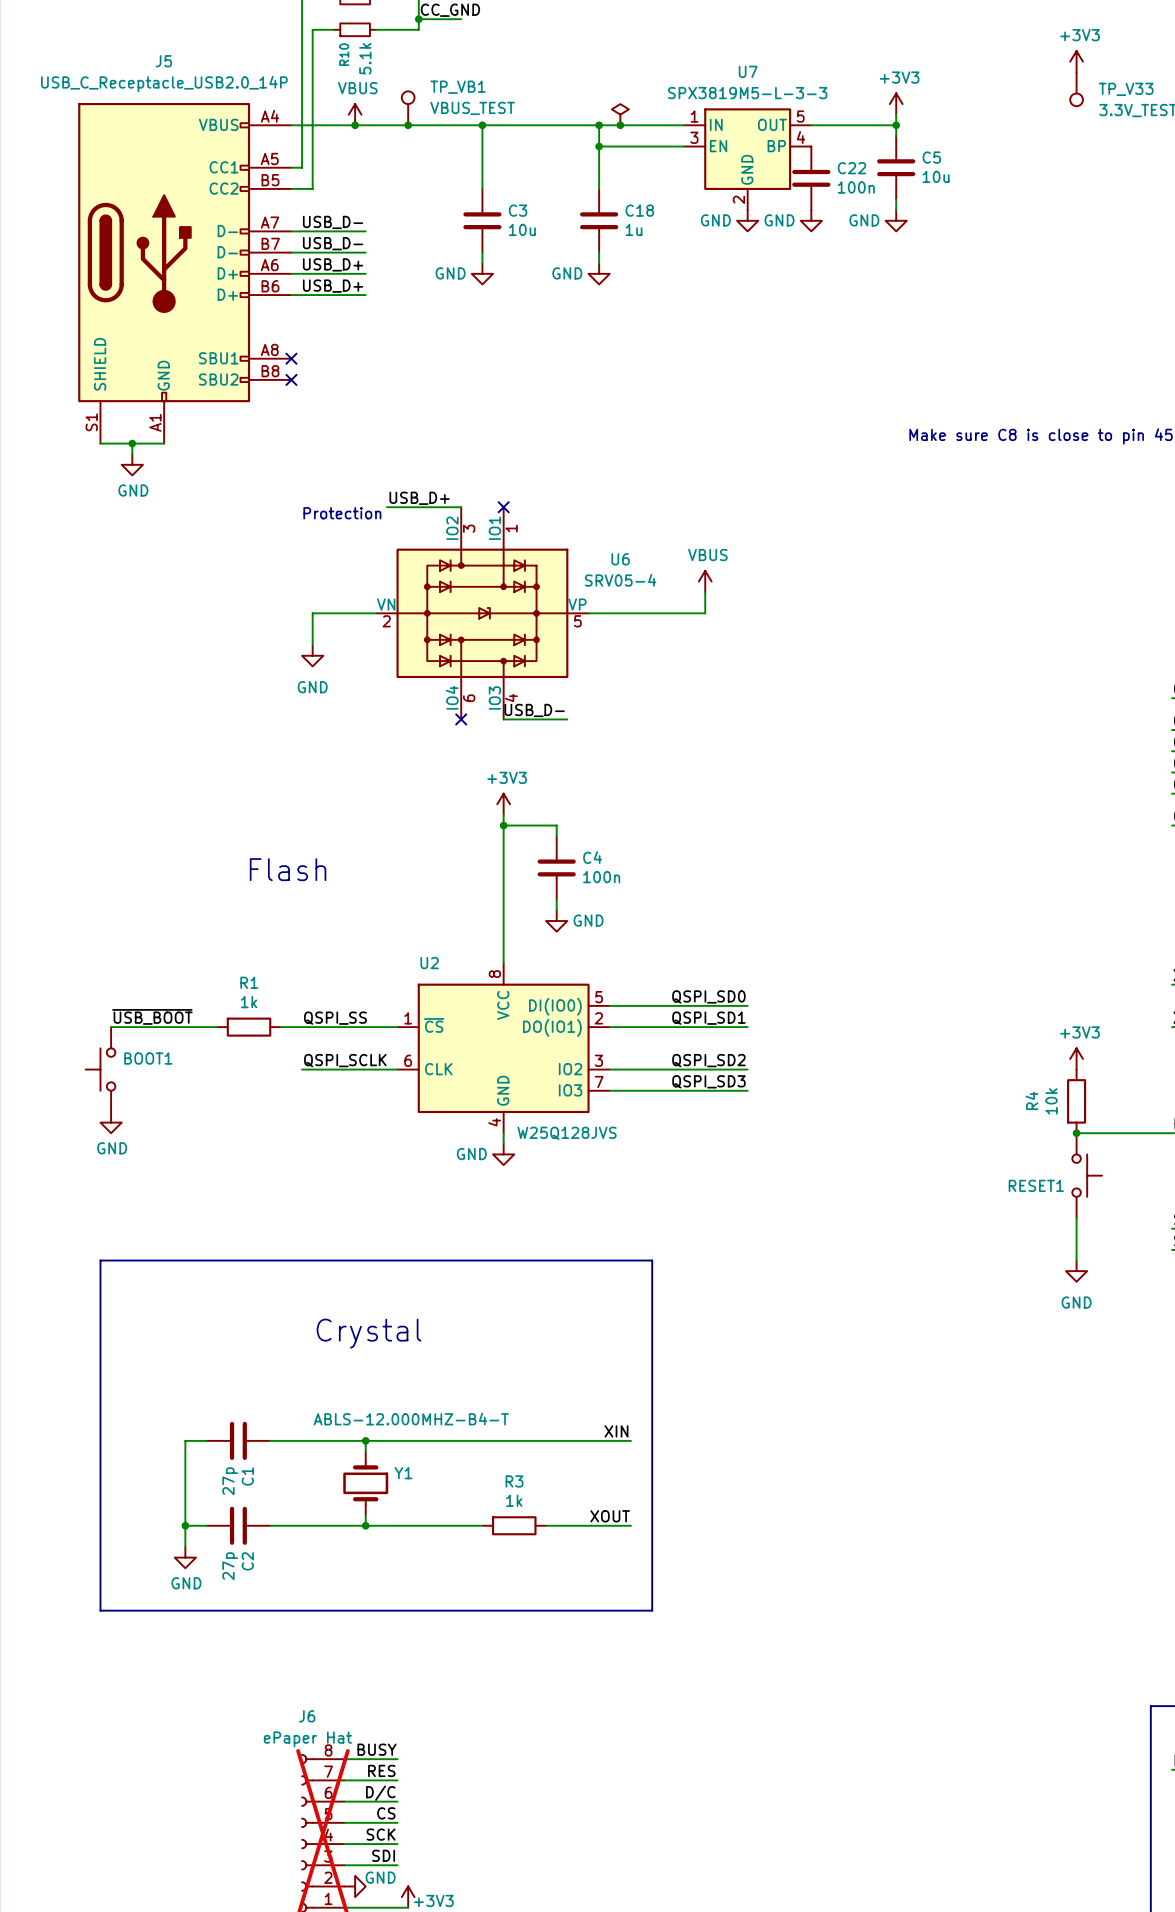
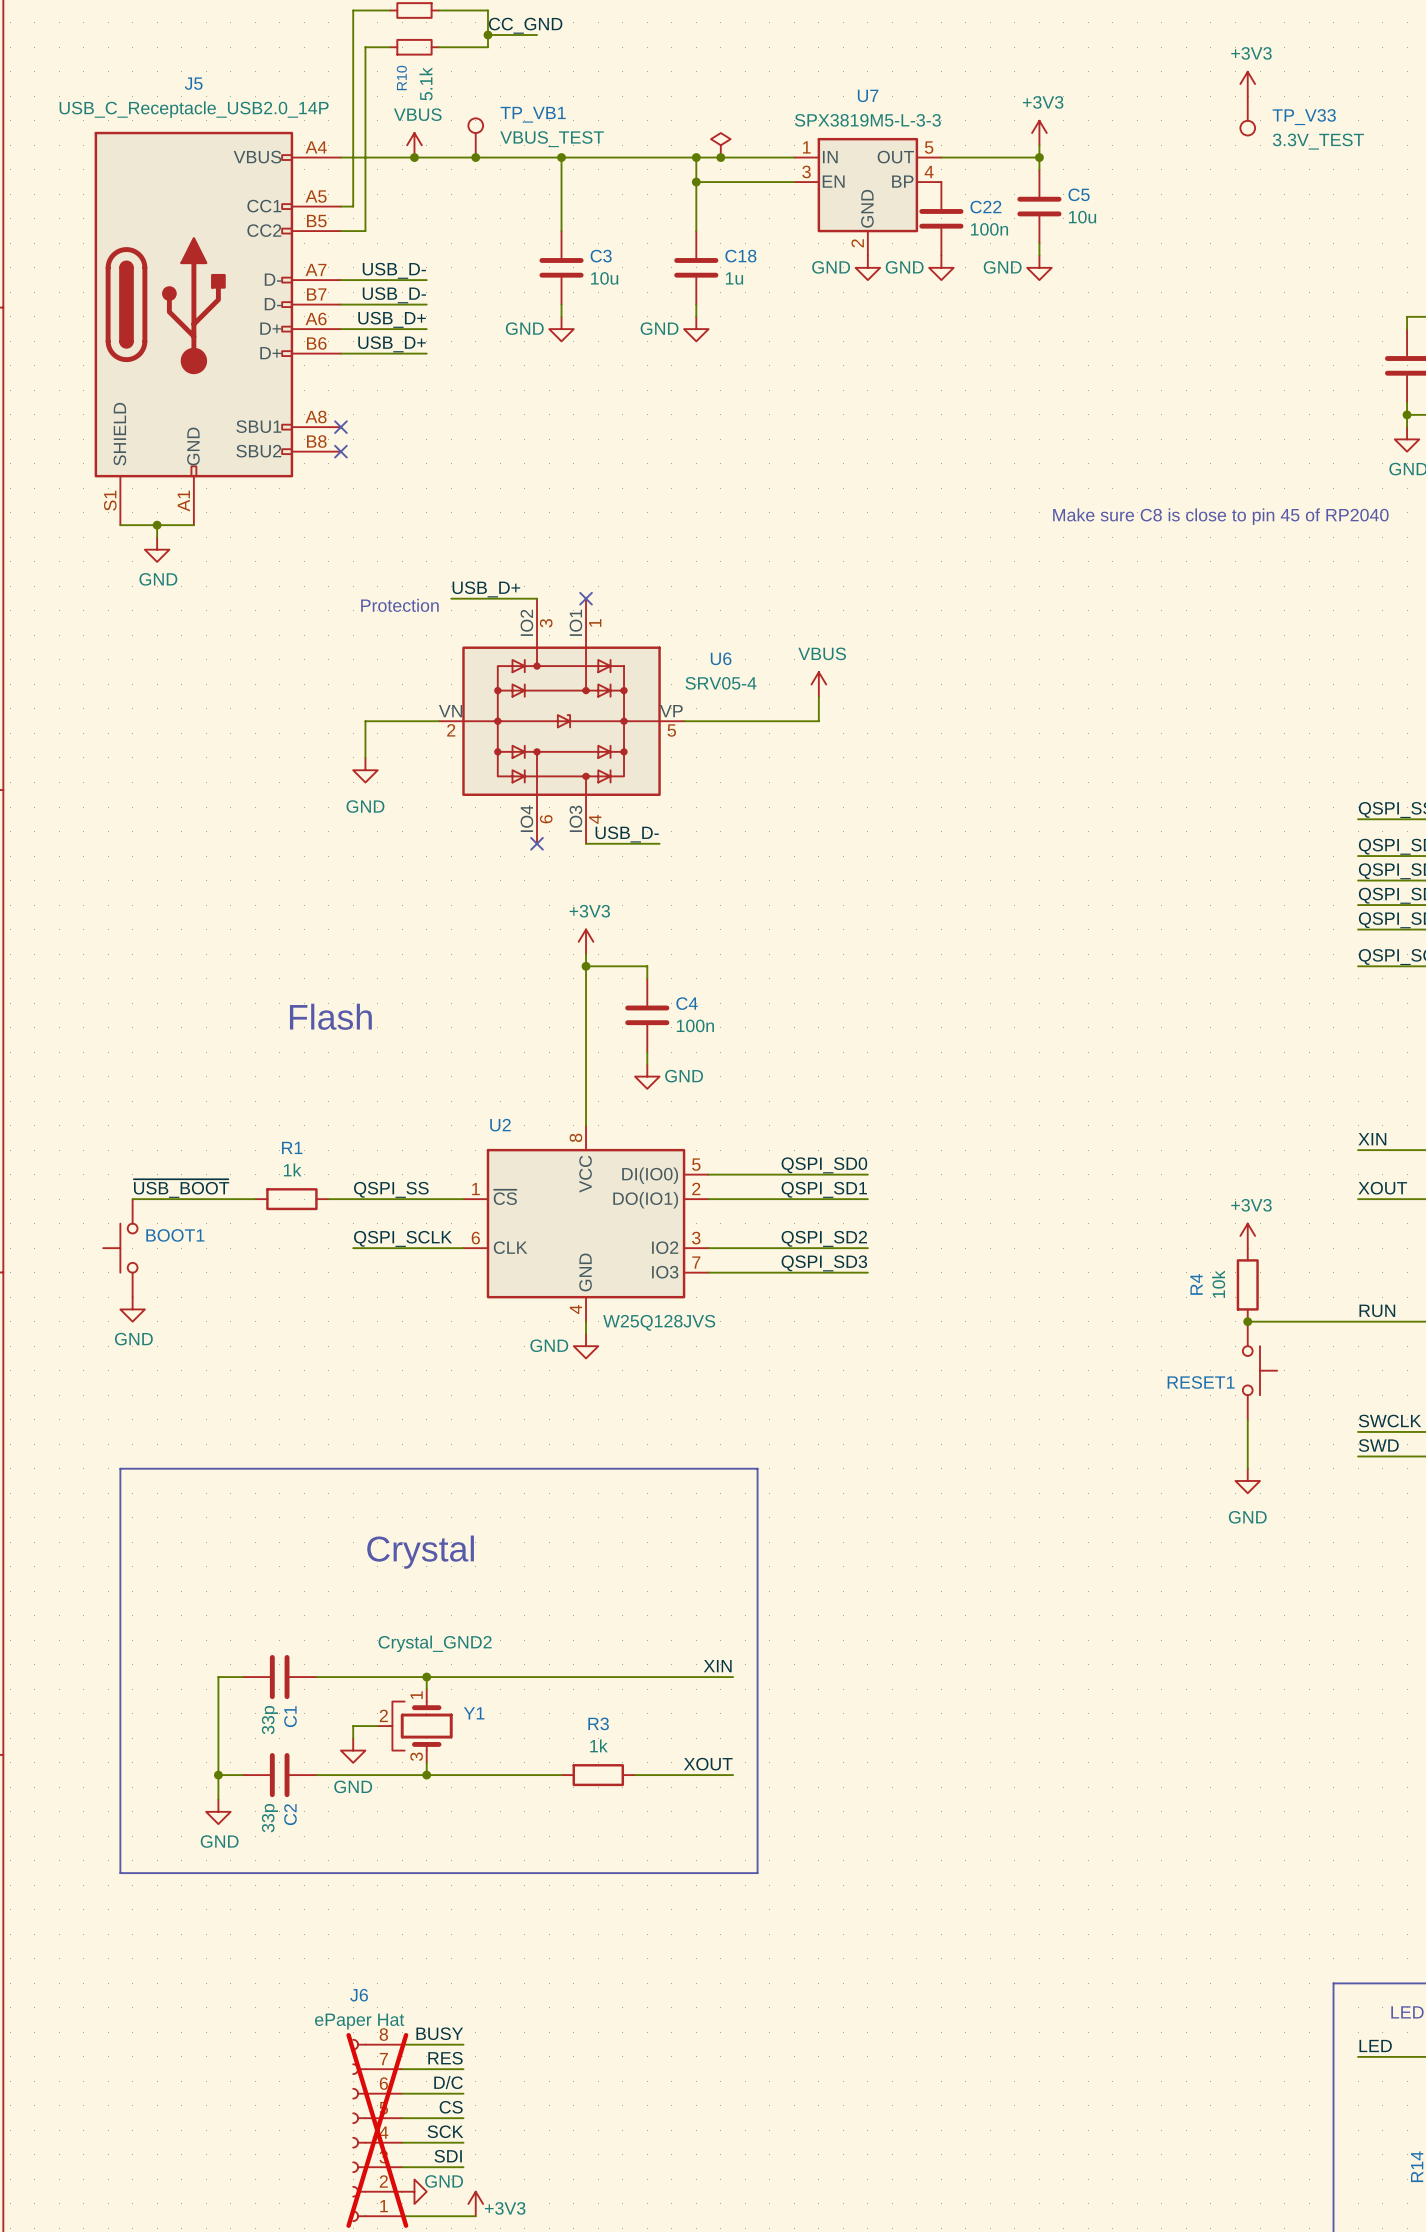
Y1 value: ABLS-12.000MHZ-B4-T (411, 1419) -> Crystal_GND2 (435, 1643)
Y1 symbol: [343, 1451, 389, 1516] -> [377, 1689, 453, 1763]
C1 value: 27p (230, 1481) -> 33p (269, 1720)
wire: none -> (377, 1726) (353, 1726) (353, 1738)
power symbol: none -> GND (353, 1750)
C2 value: 27p (230, 1566) -> 33p (269, 1818)

